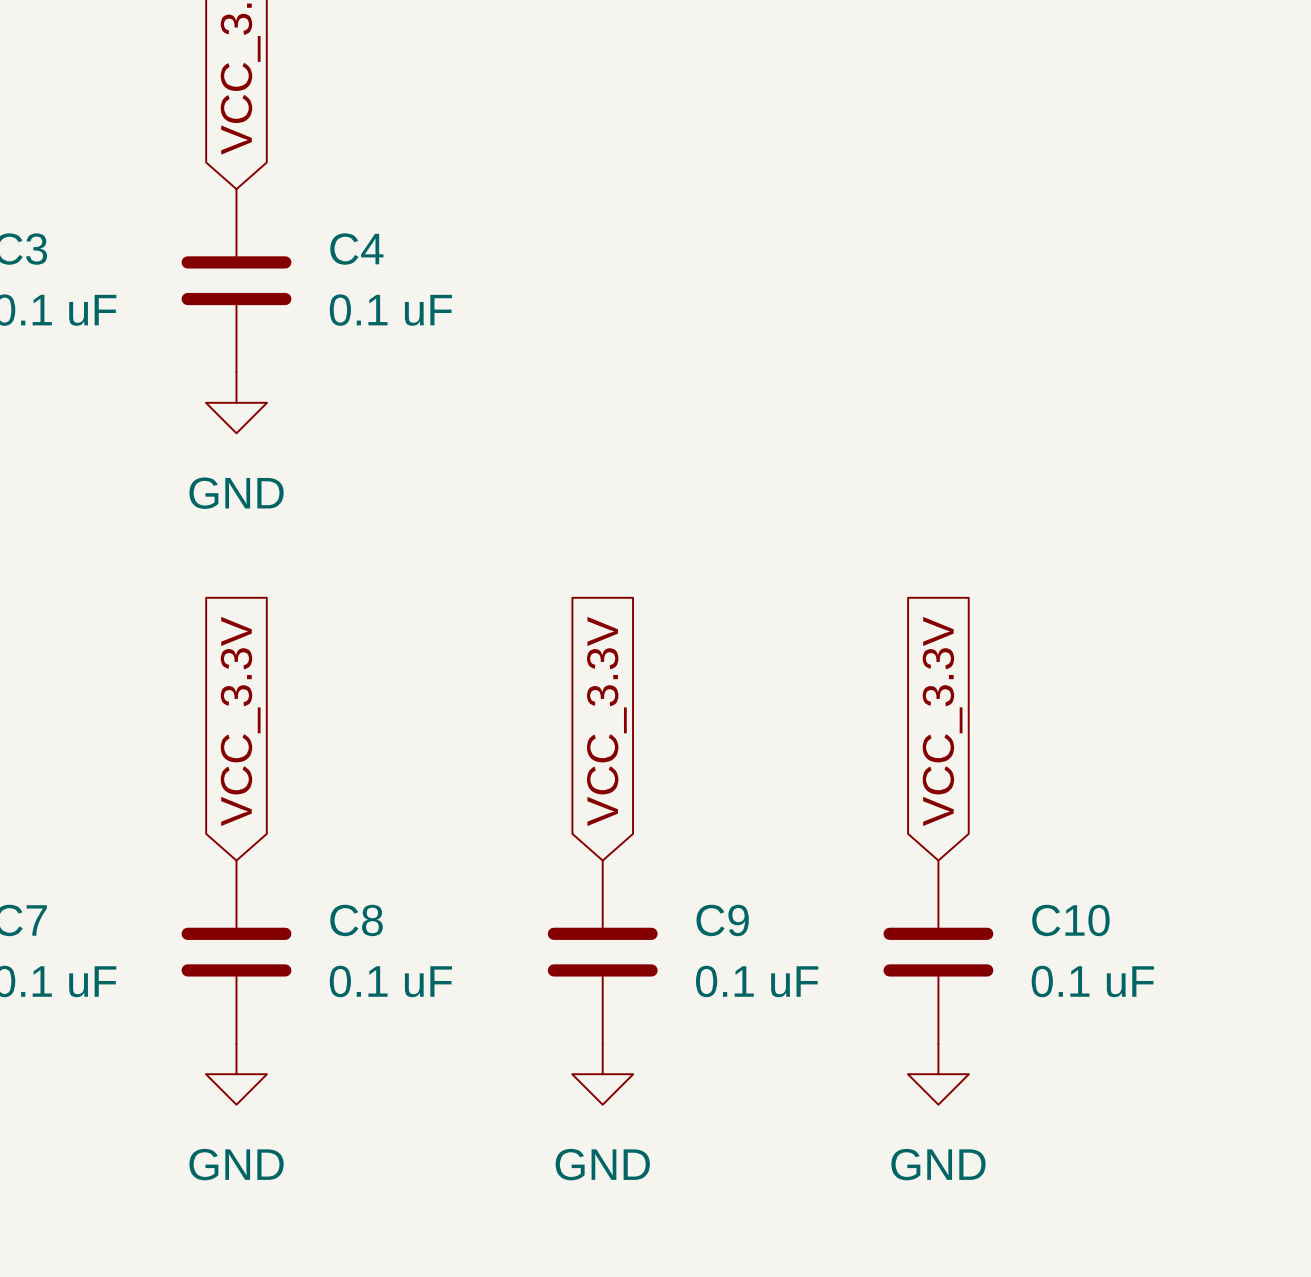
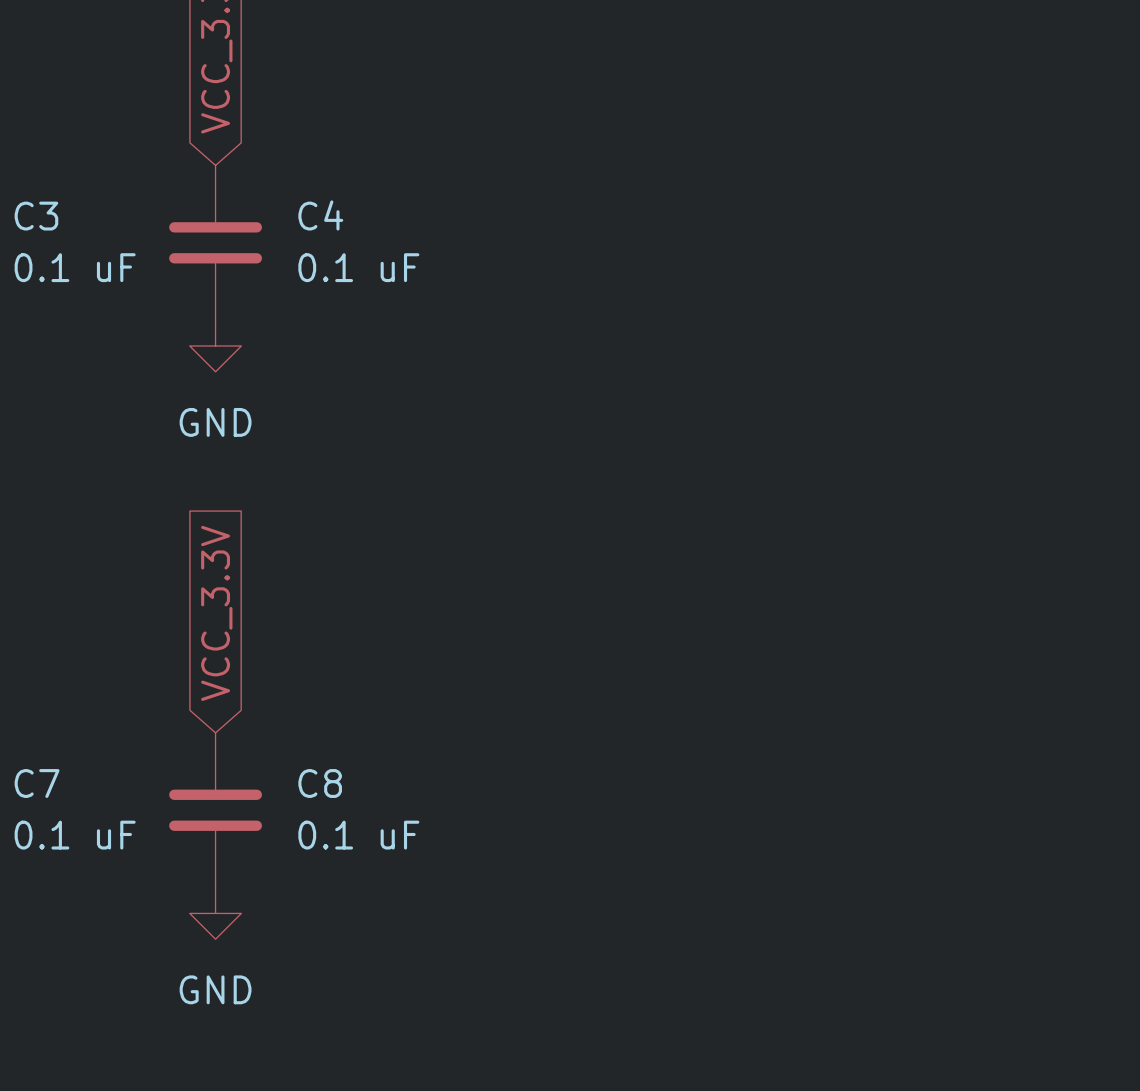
global label: VCC_3.3V (606, 721) -> none
global label: VCC_3.3V (942, 721) -> none
C9: 0.1 uF (602, 952) -> none
C10: 0.1 uF (938, 952) -> none
power symbol: GND (602, 1074) -> none
power symbol: GND (938, 1074) -> none

